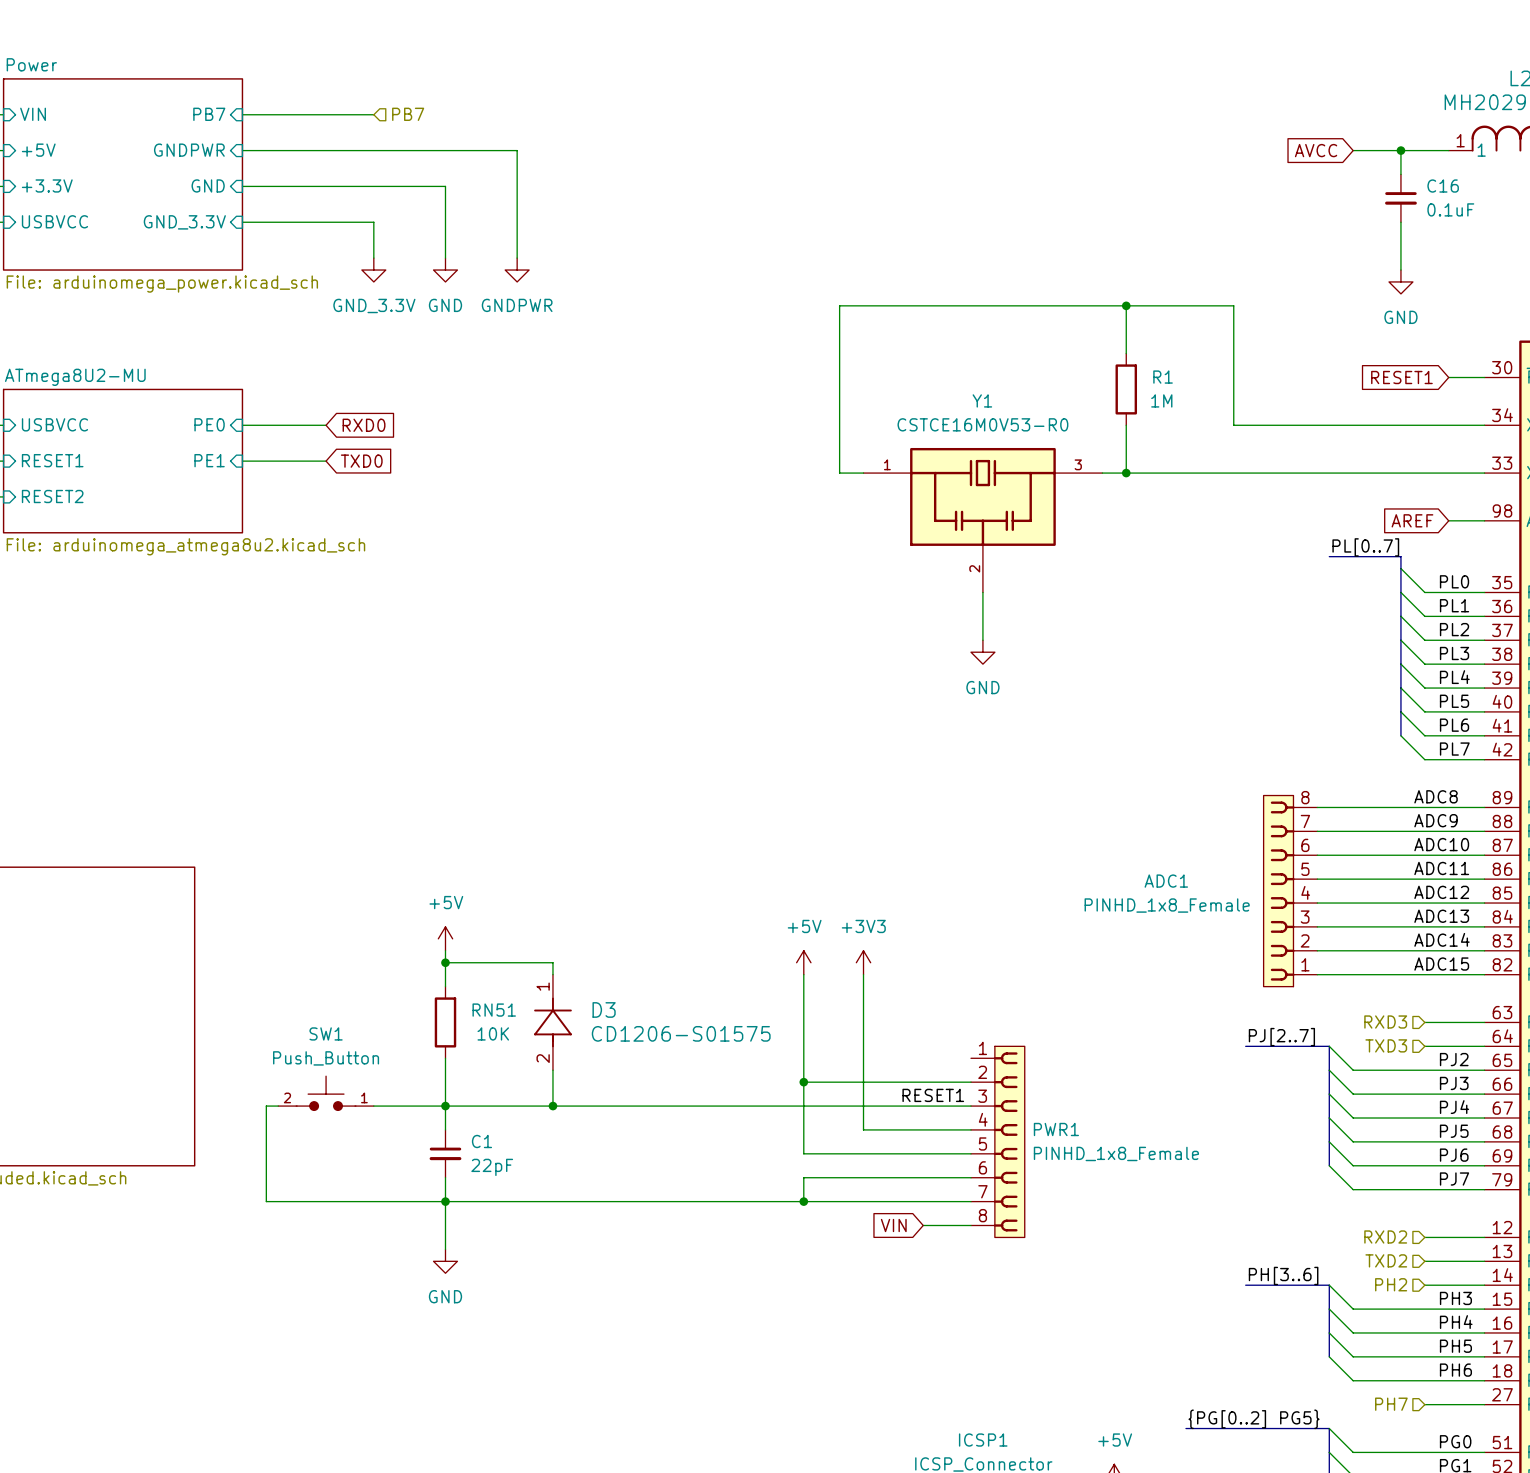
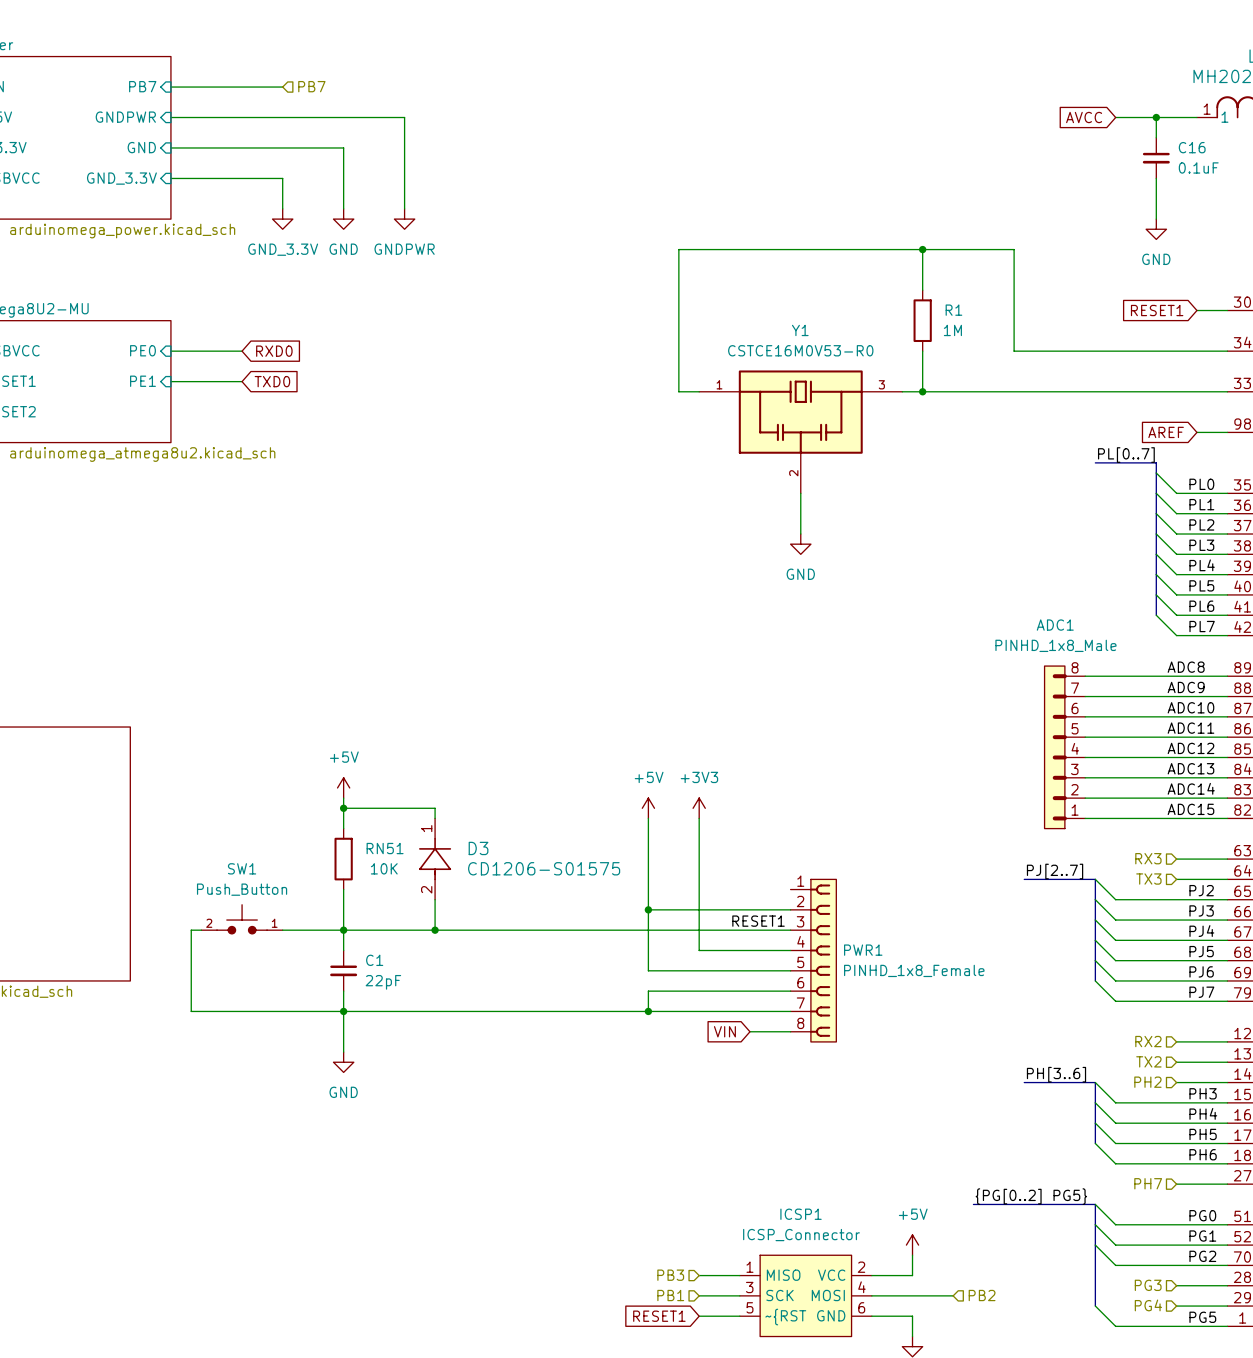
ADC1 symbol: [1263, 795, 1318, 987] -> [1044, 666, 1086, 829]
ADC1 name position: ADC1 (1166, 881) -> ADC1 (1055, 625)
ADC1 value: PINHD_1x8_Female (1167, 905) -> PINHD_1x8_Male (1055, 645)
hierarchical label: RXD3 (1385, 1022) -> RX3 (1148, 858)
hierarchical label: TXD3 (1386, 1045) -> TX3 (1148, 879)
hierarchical label: RXD2 (1385, 1236) -> RX2 (1148, 1041)
hierarchical label: TXD2 (1386, 1260) -> TX2 (1148, 1061)

